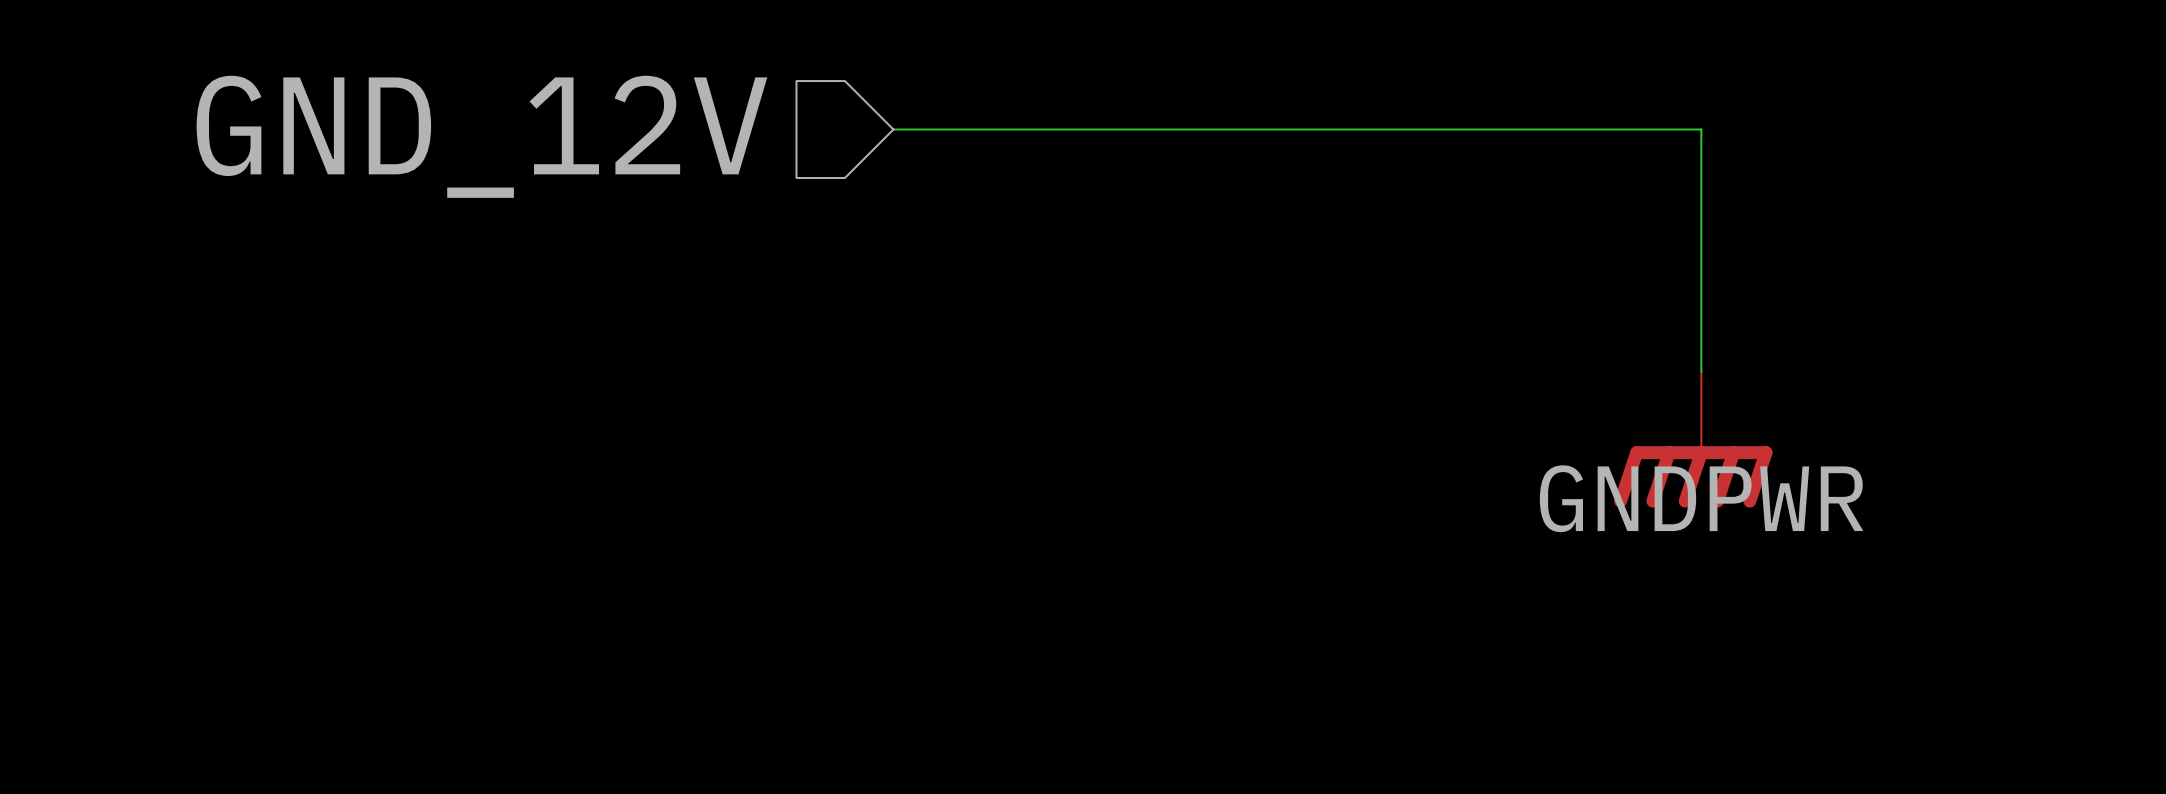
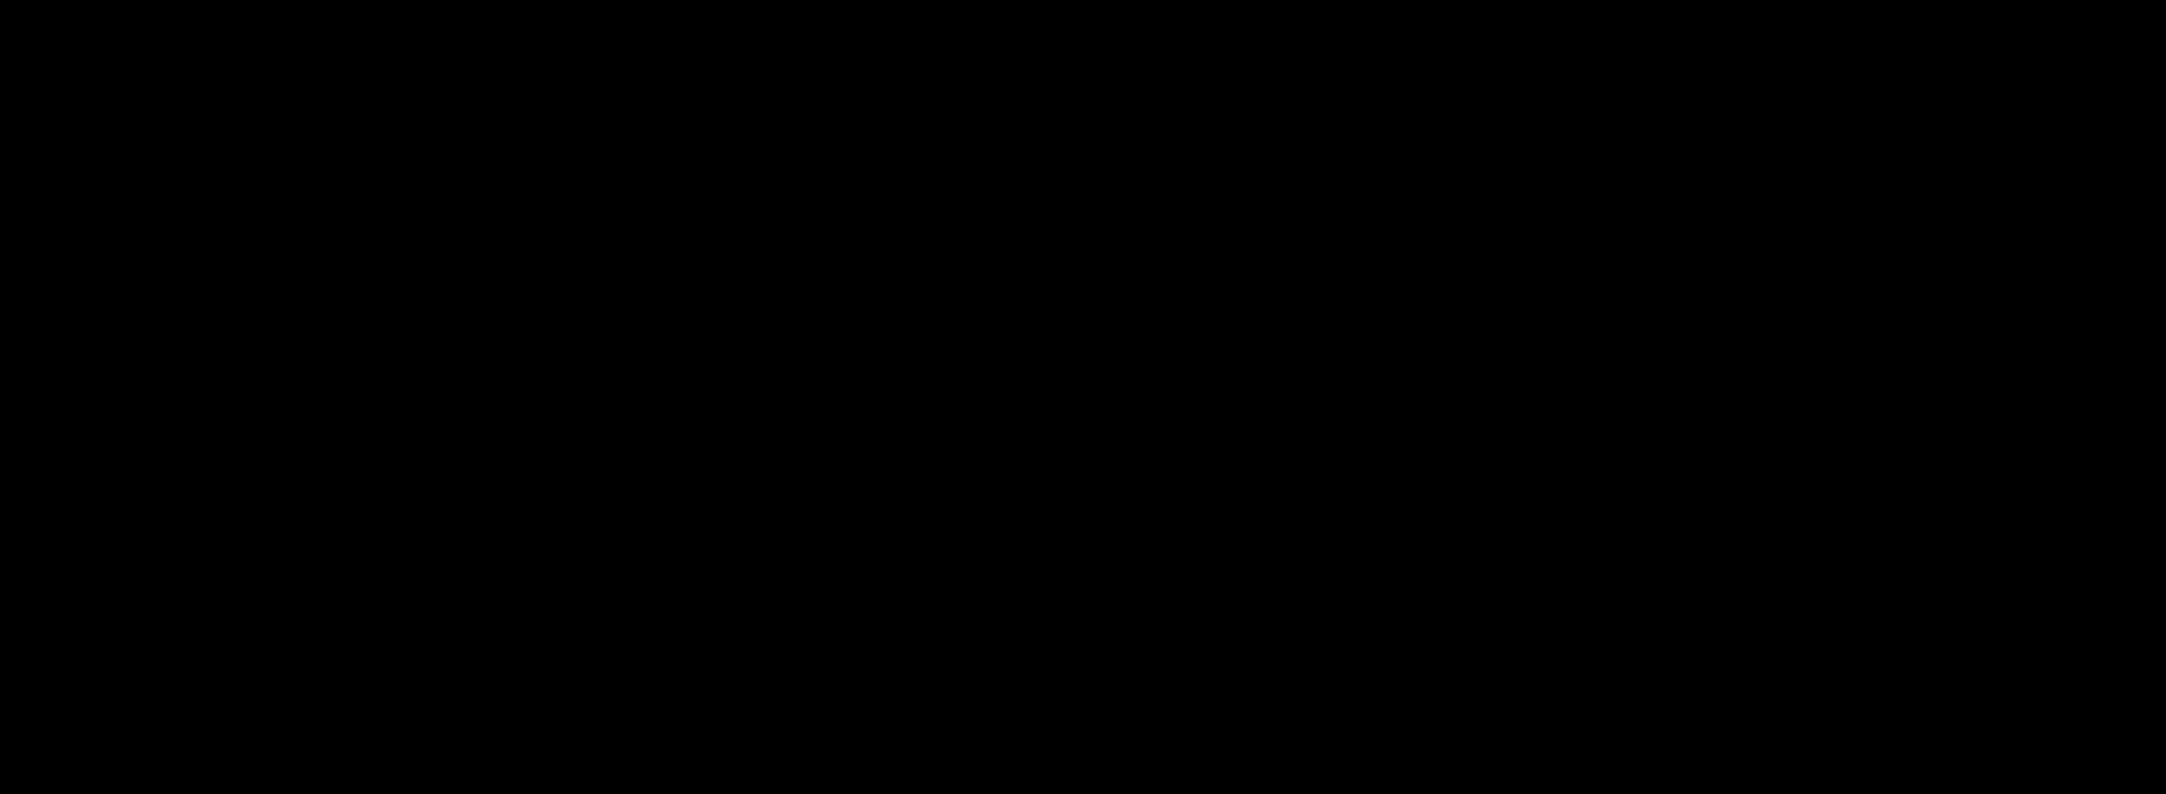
wire: (893, 129) (1701, 129) (1701, 371) -> none
hierarchical label: GND_12V (481, 136) -> none
power symbol: GNDPWR (1693, 439) -> none

